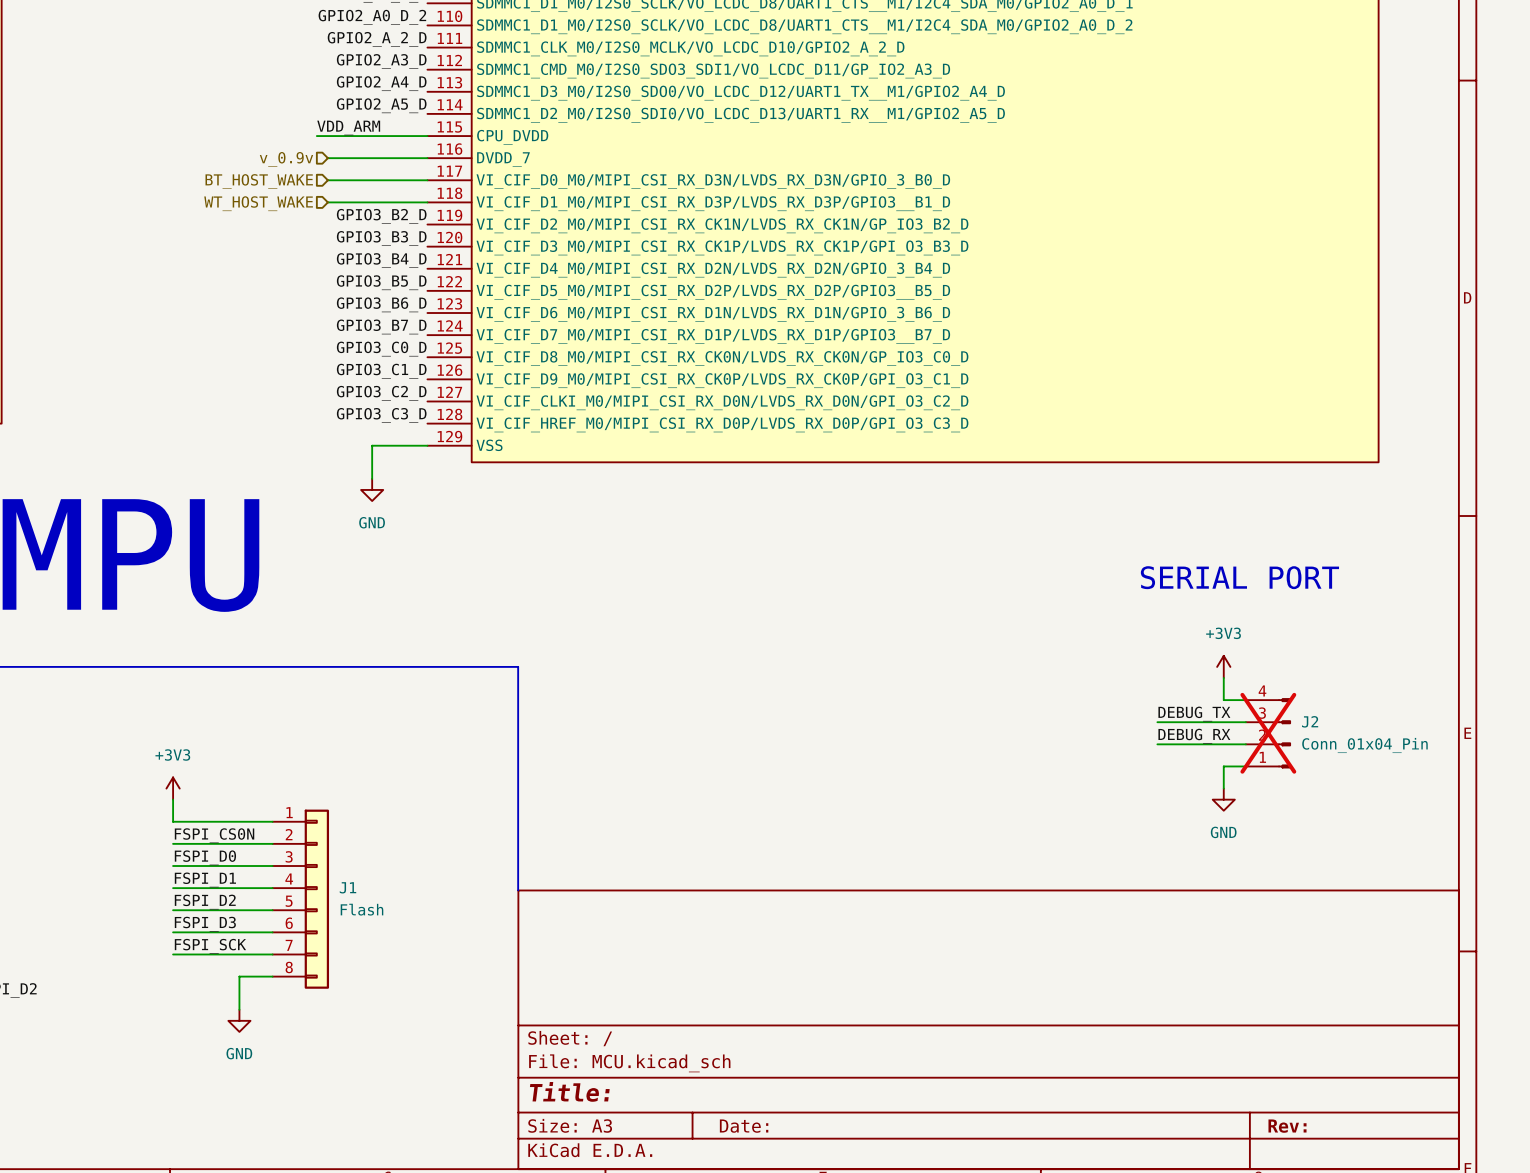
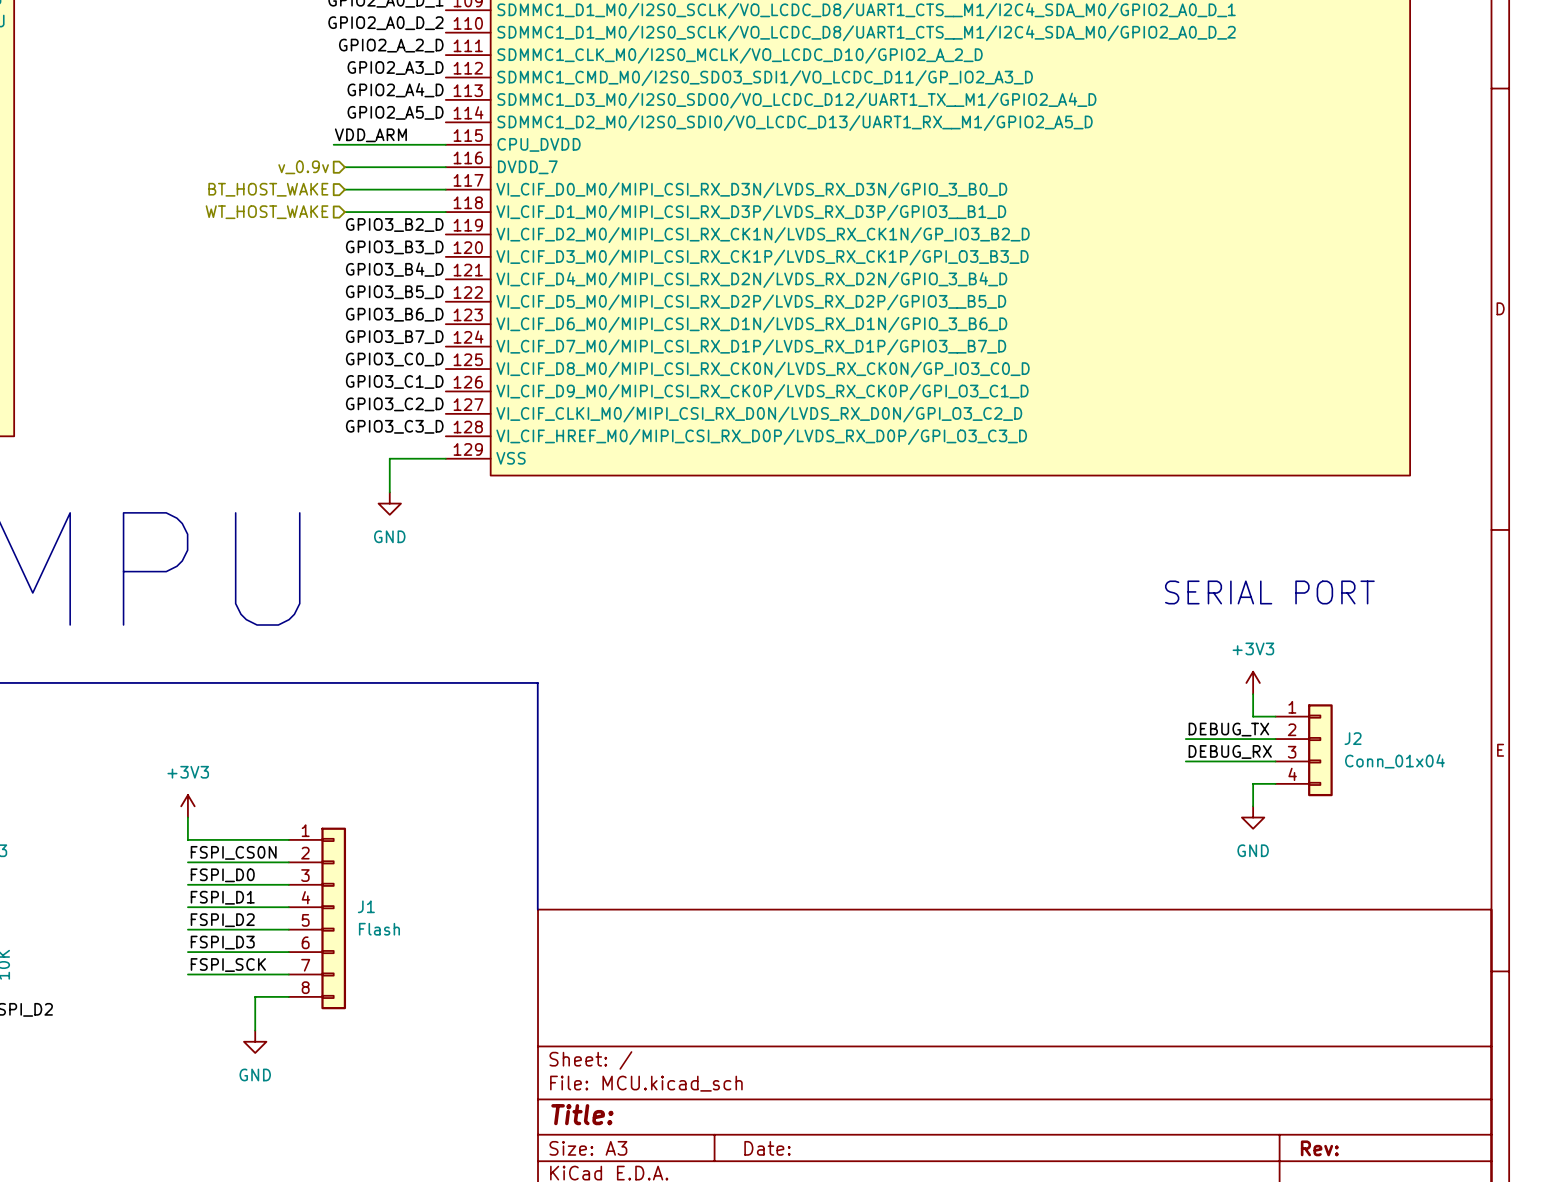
J2 symbol: [1245, 698, 1291, 769] -> [1275, 704, 1333, 797]
J2 do-not-place cross: (1268, 733) -> none
J2 value: Conn_01x04_Pin (1364, 745) -> Conn_01x04 (1394, 761)

